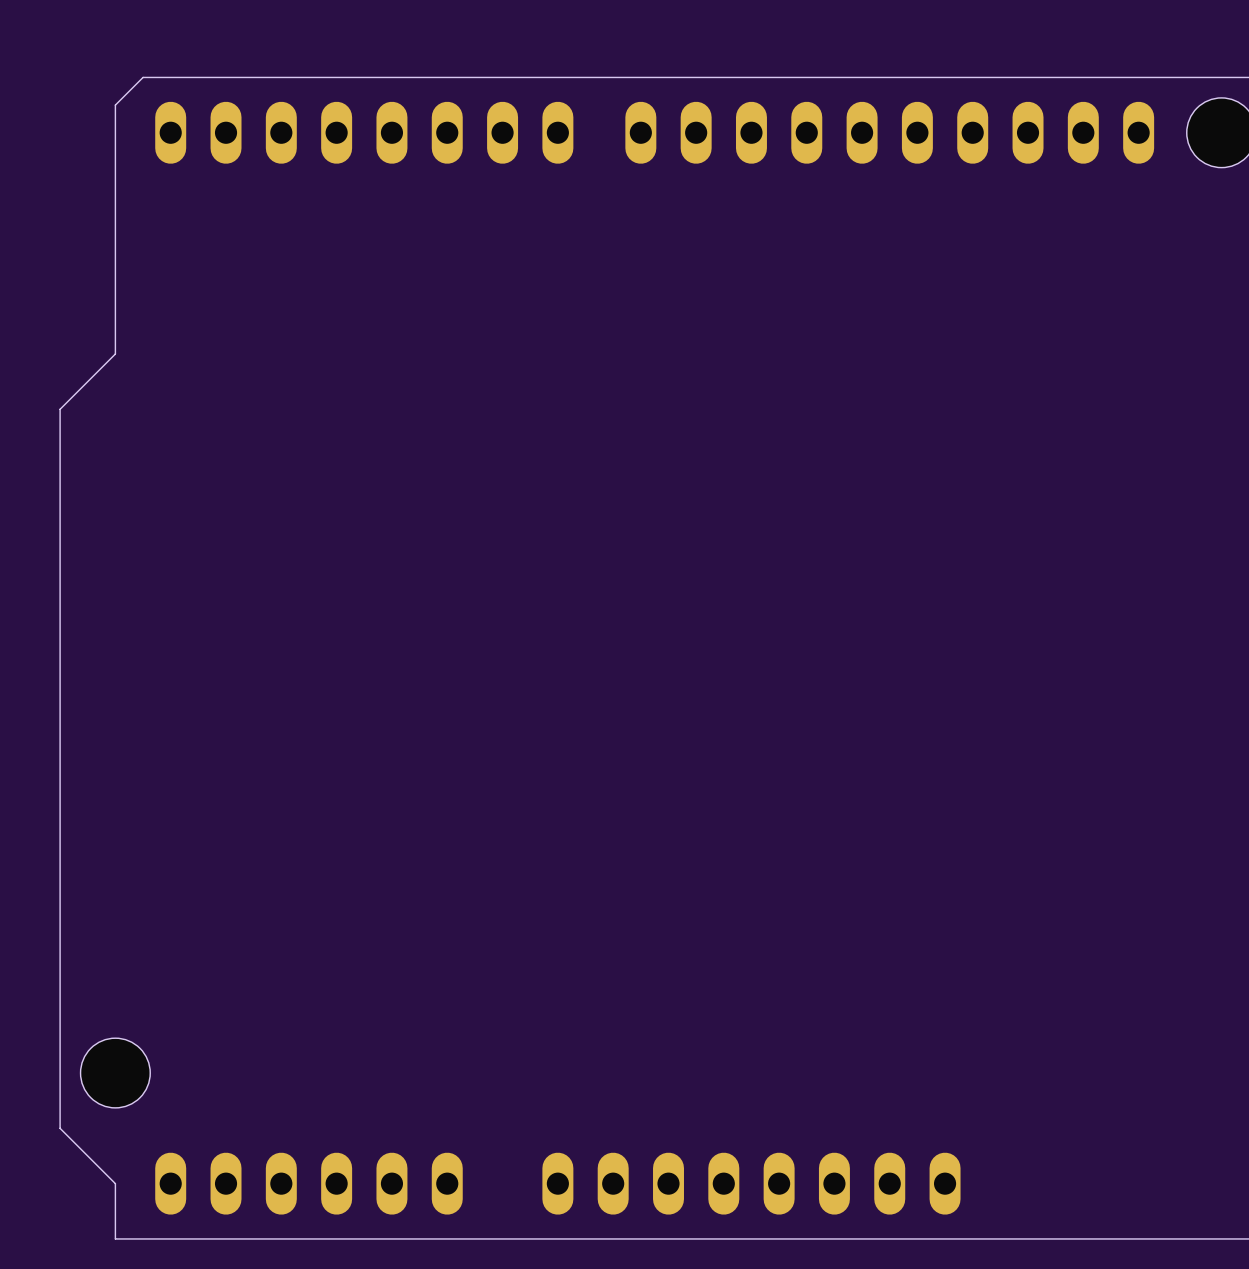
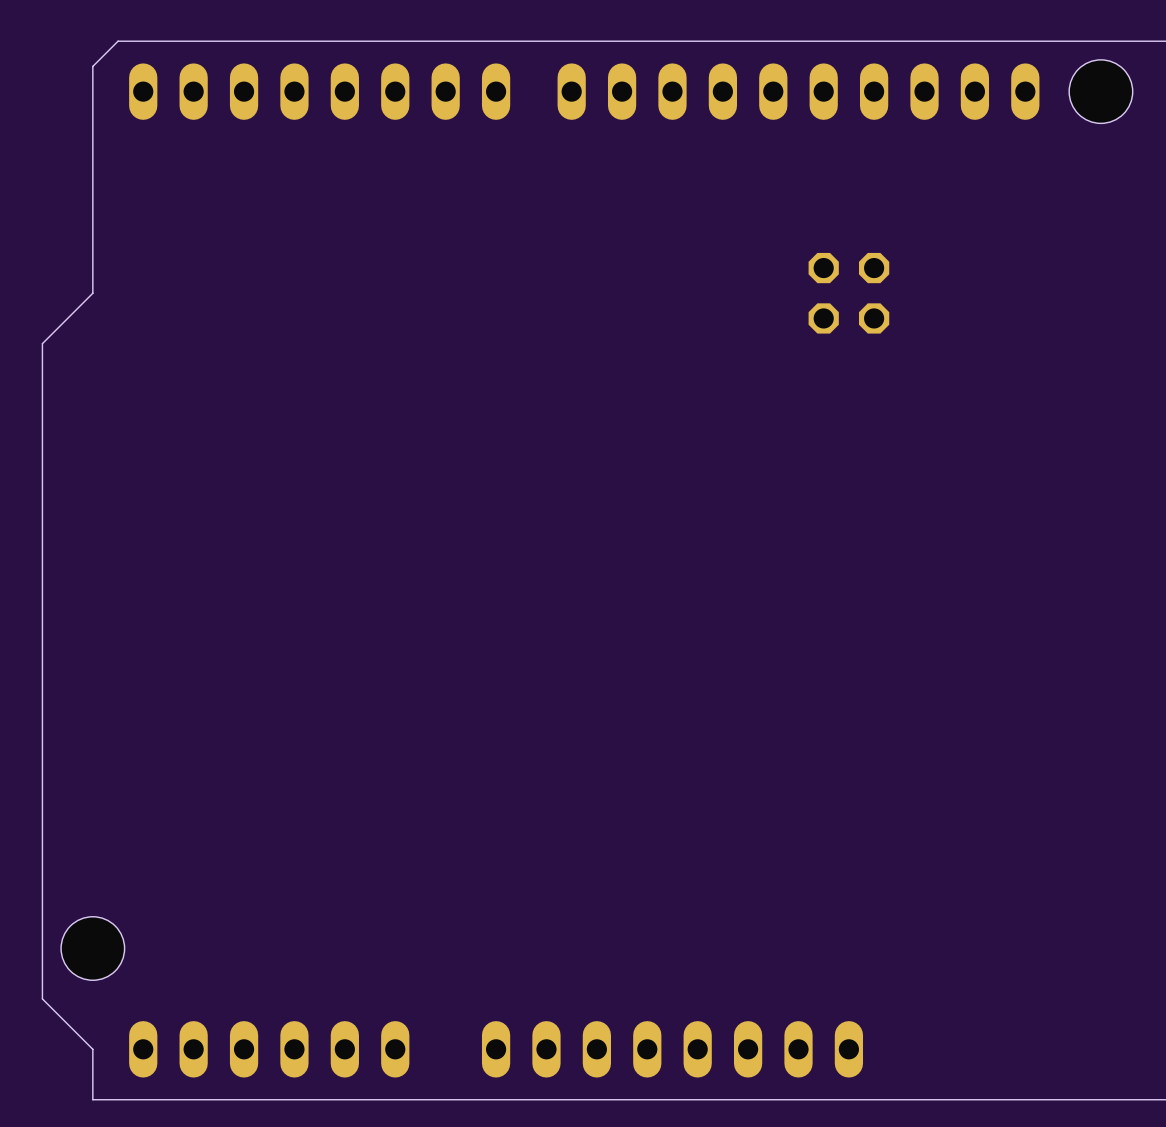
part: none -> (848, 293)

